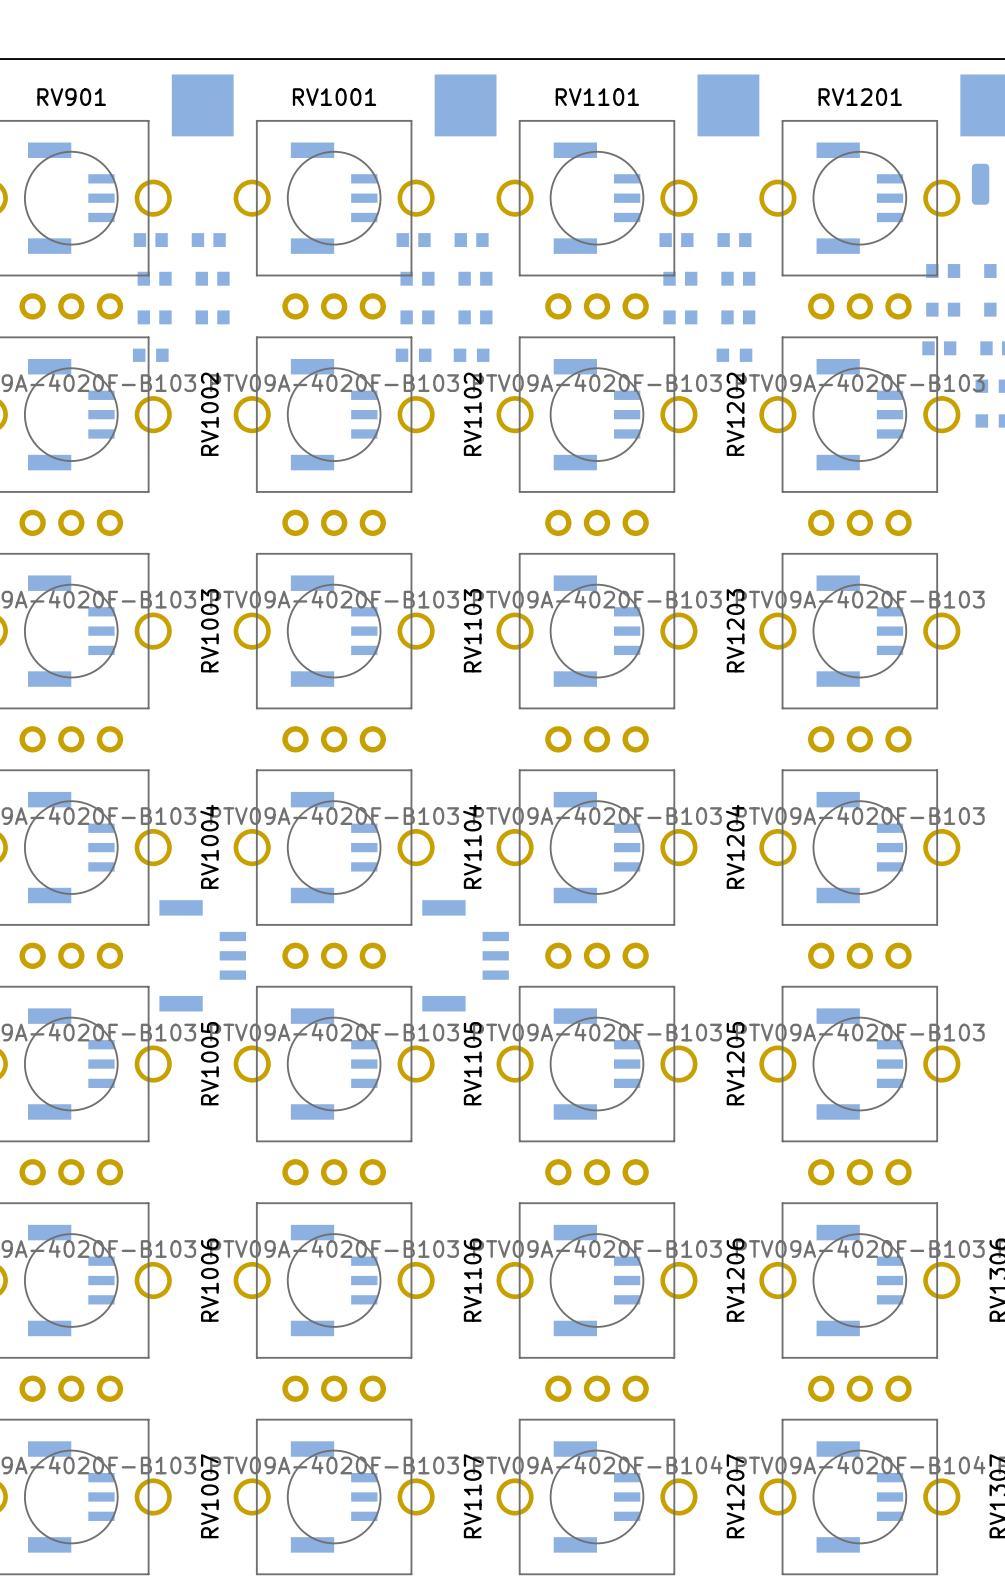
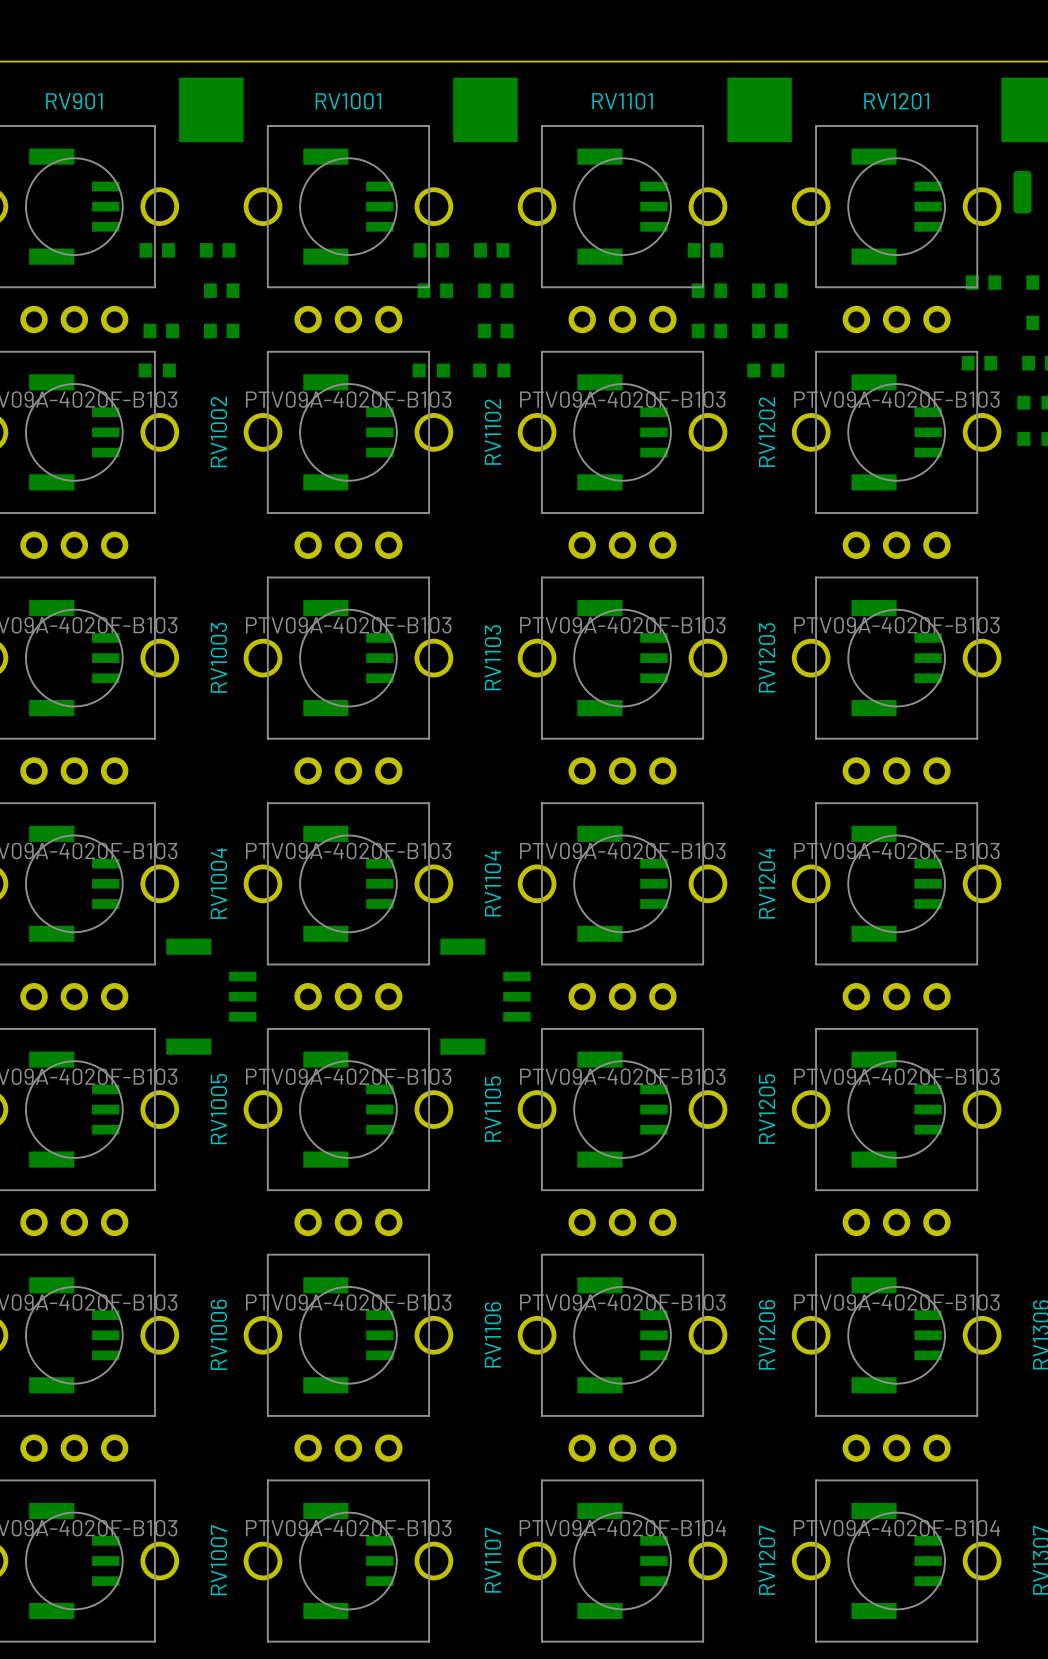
part: (734, 240) -> none
part: (154, 278) -> none
part: (943, 309) -> none
part: (417, 317) -> none

